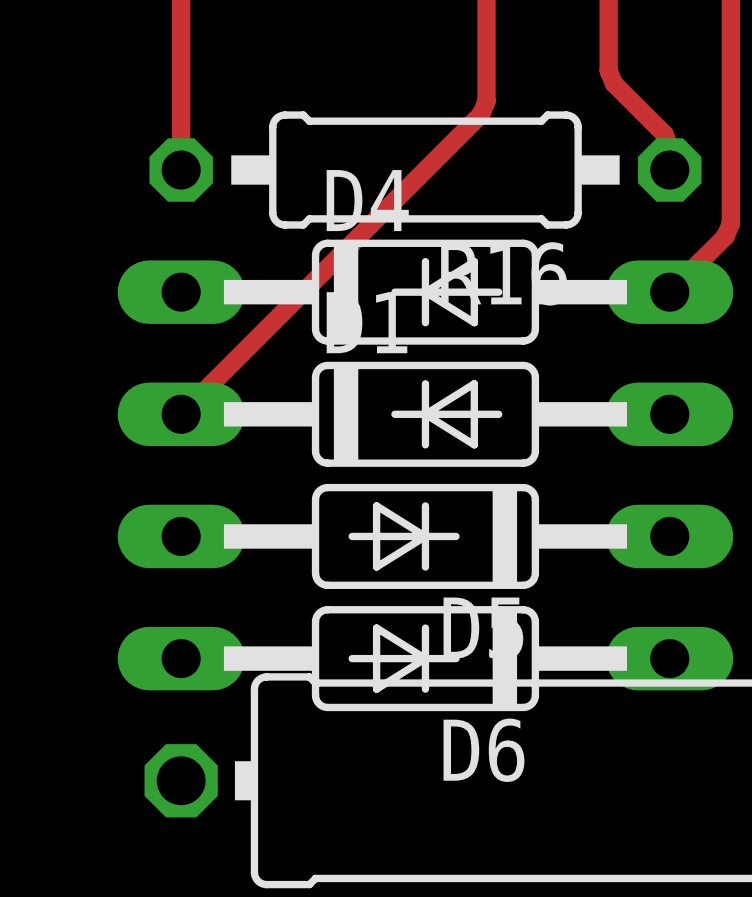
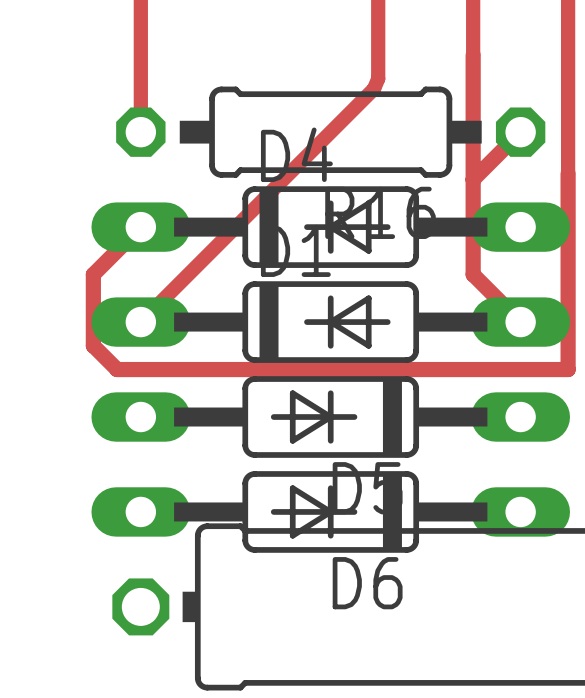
track: (608, 70) (614, 83) (664, 134) (669, 147) (669, 170) -> (473, 179) (520, 132)
track: none -> (473, 55) (473, 274) (520, 322)
track: (730, 223) (725, 236) (669, 292) -> (568, 173) (568, 369) (117, 369) (93, 345) (93, 274) (140, 227)

